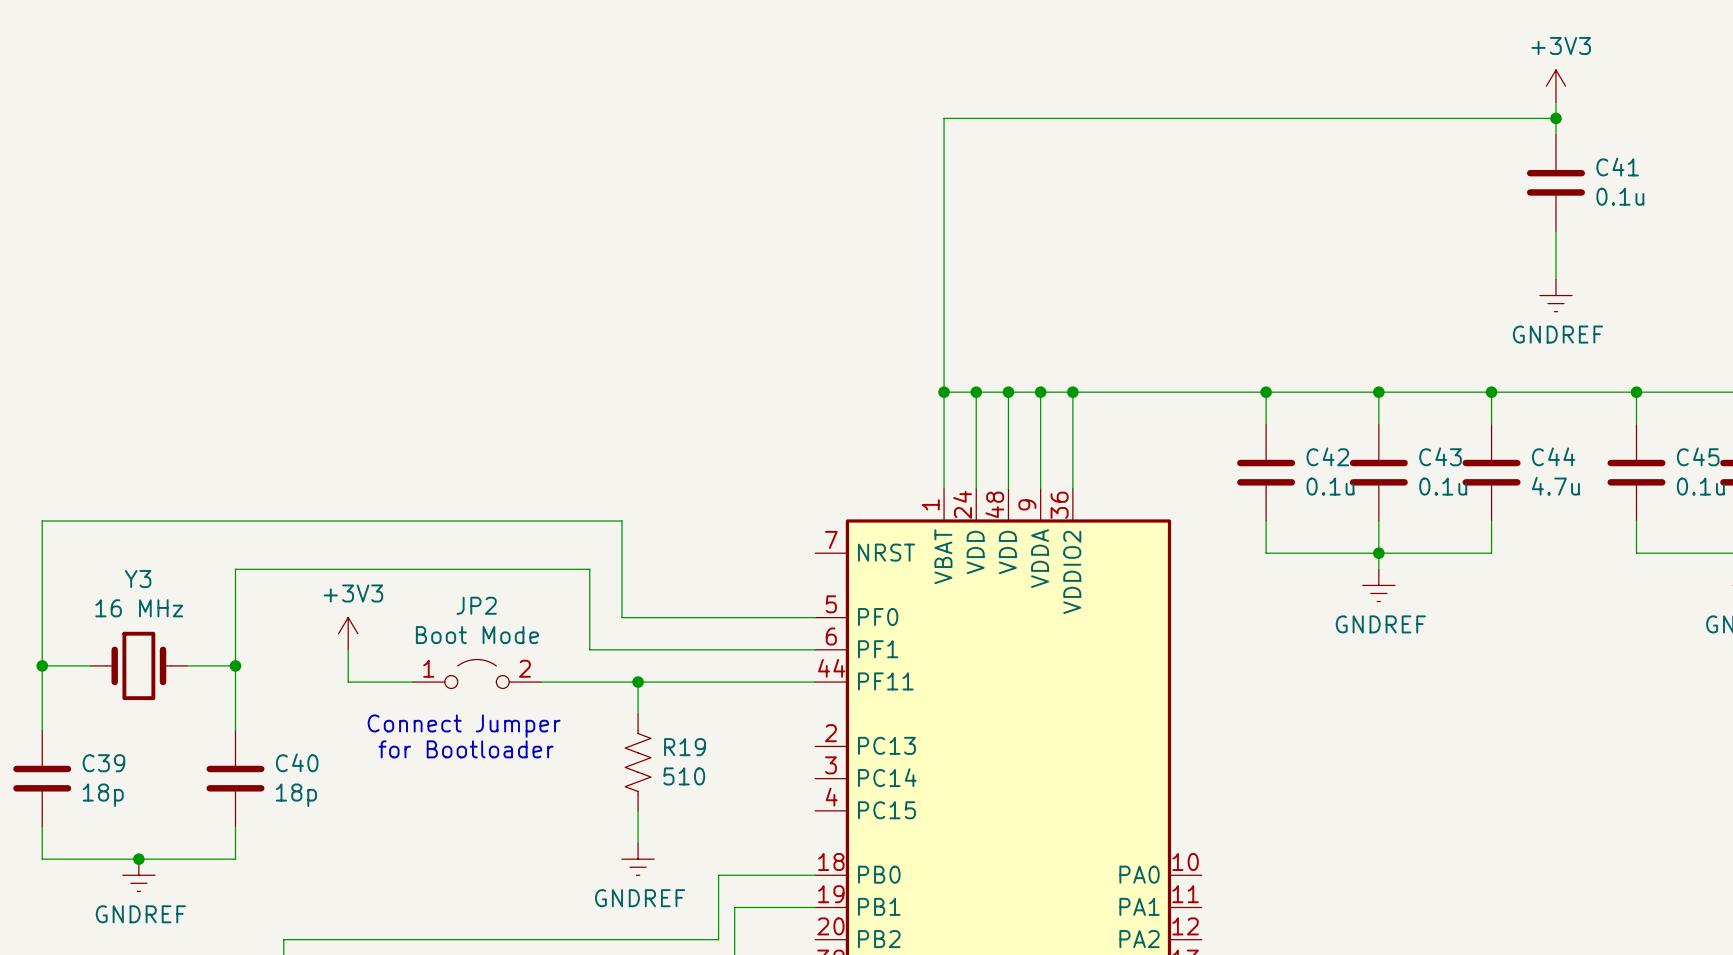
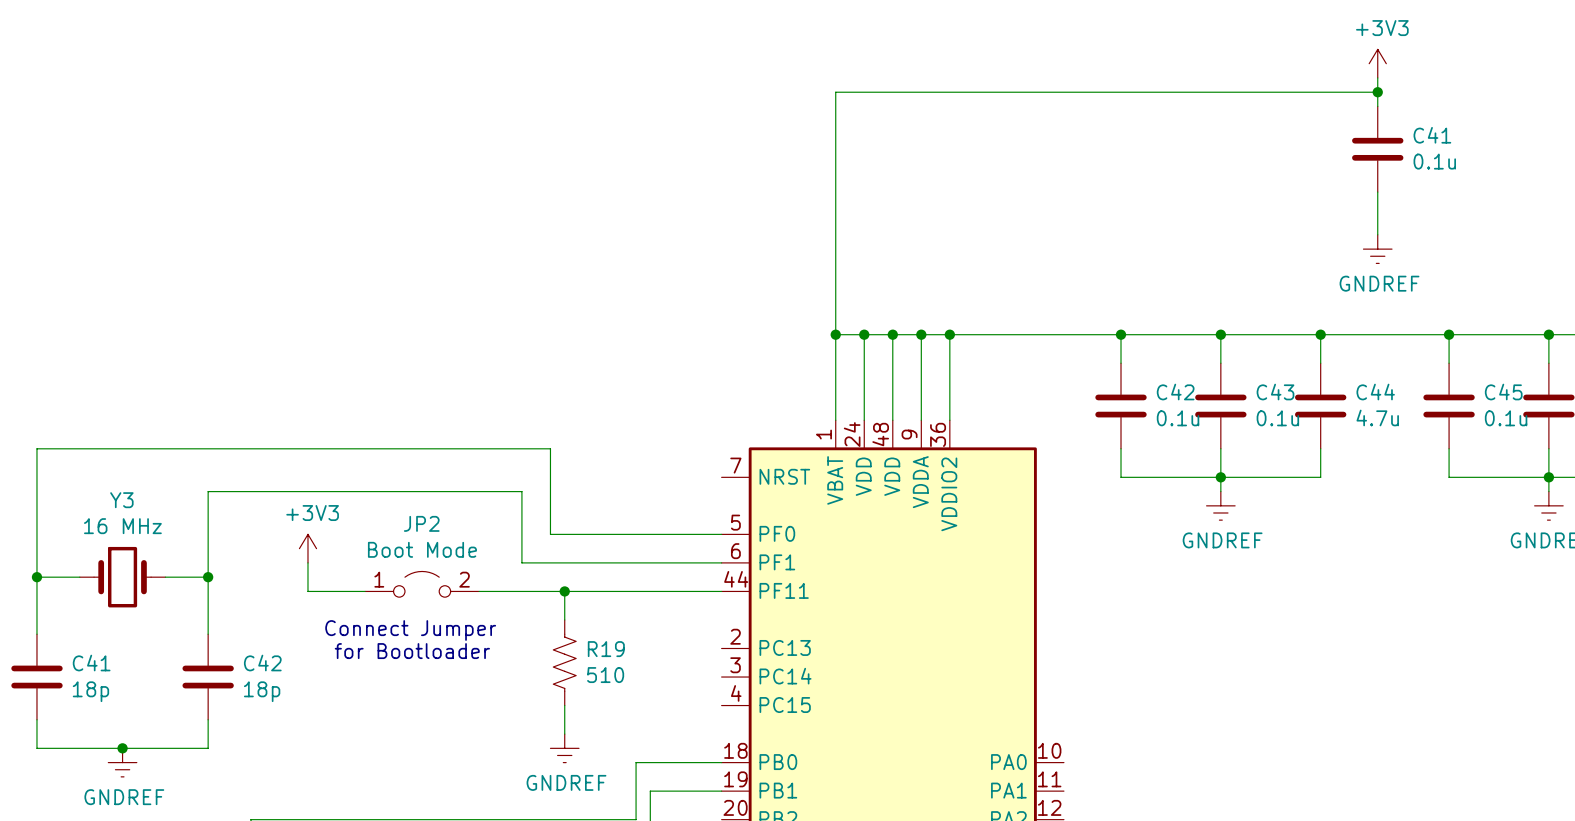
C40 name: C40 (297, 762) -> C42 (262, 663)
C39 name: C39 (103, 763) -> C41 (91, 663)

